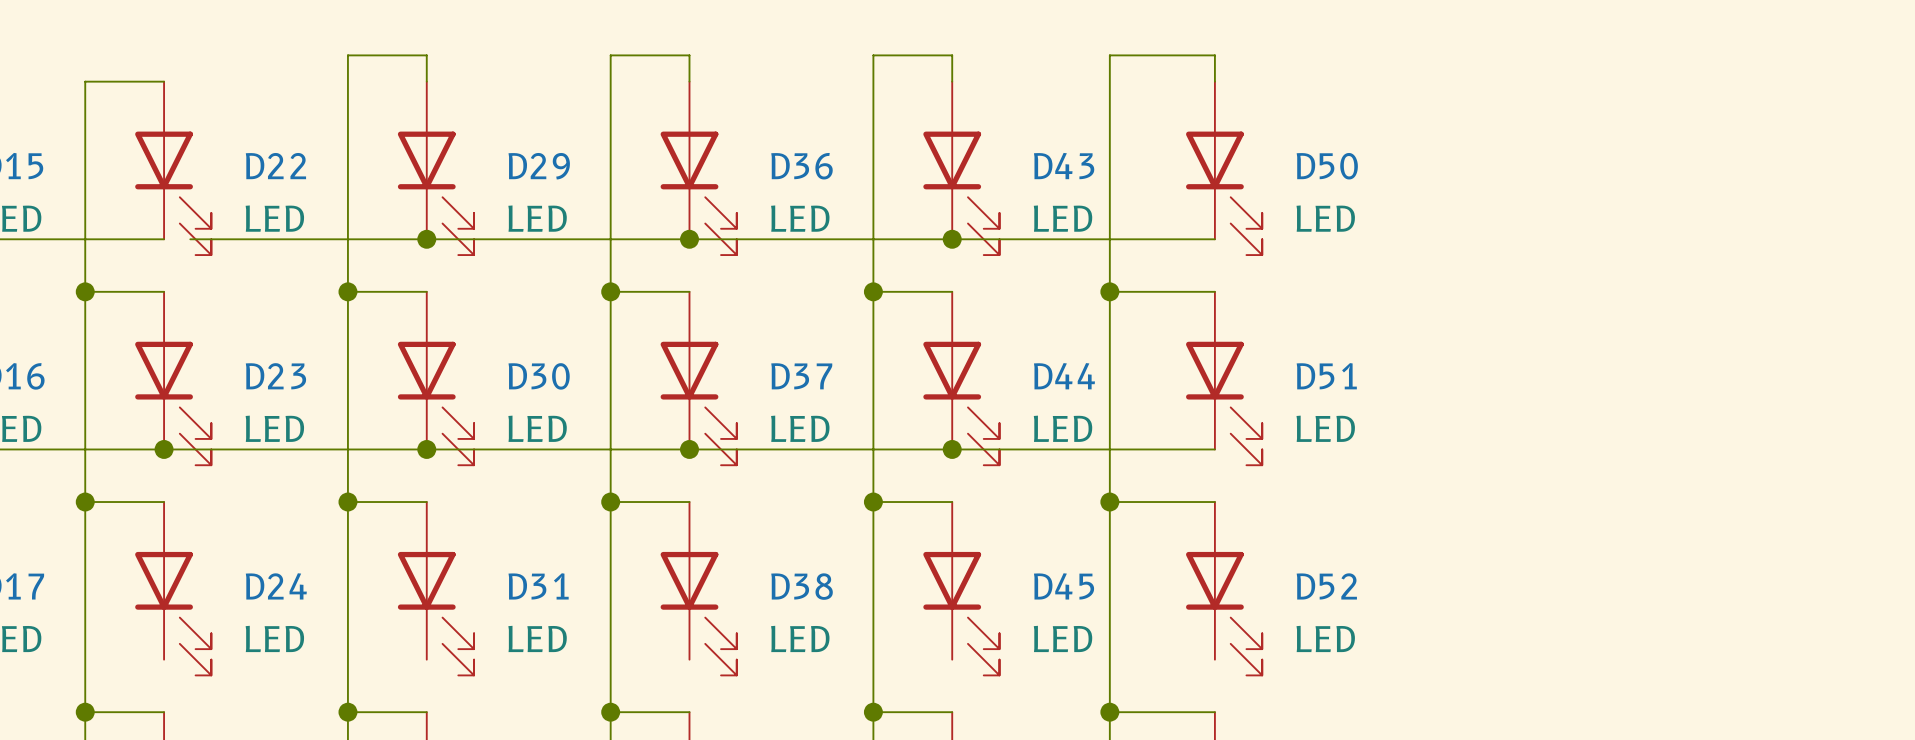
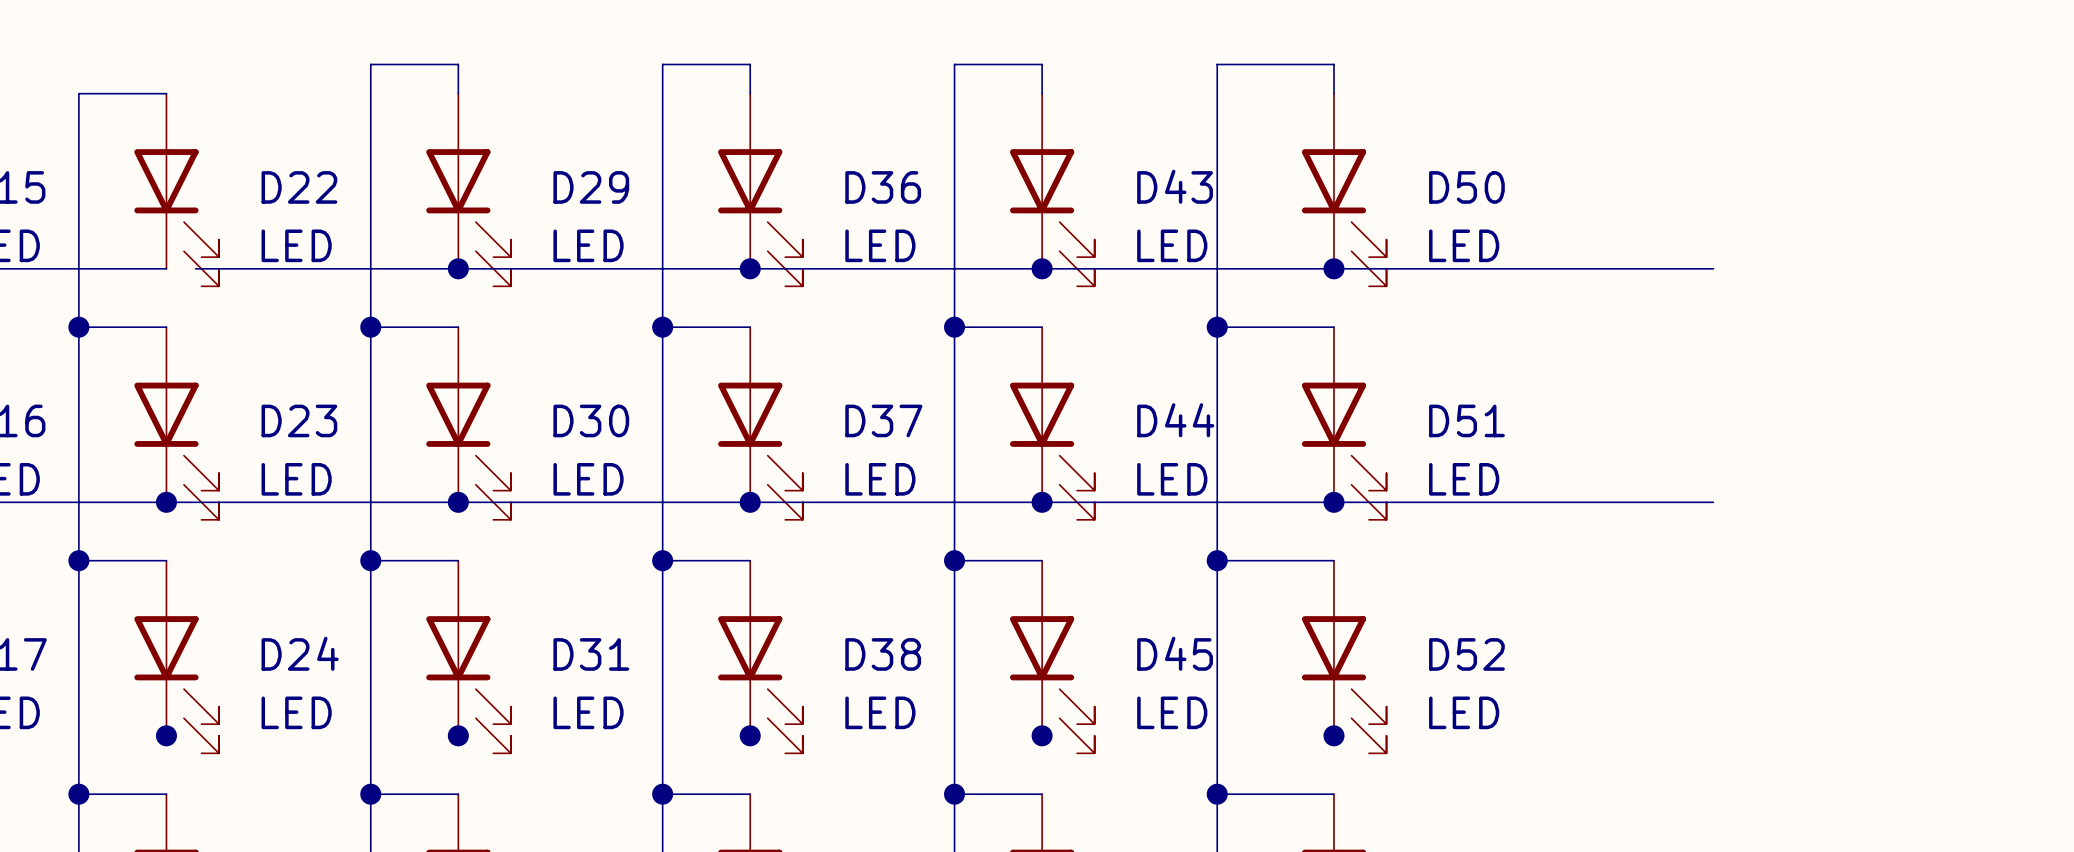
wire: none -> (1333, 268) (1713, 268)
junction: none -> (1333, 268)
wire: none -> (1333, 502) (1713, 502)
junction: none -> (1333, 502)
junction: none -> (166, 735)
junction: none -> (458, 735)
junction: none -> (750, 735)
junction: none -> (1042, 735)
junction: none -> (1333, 735)

